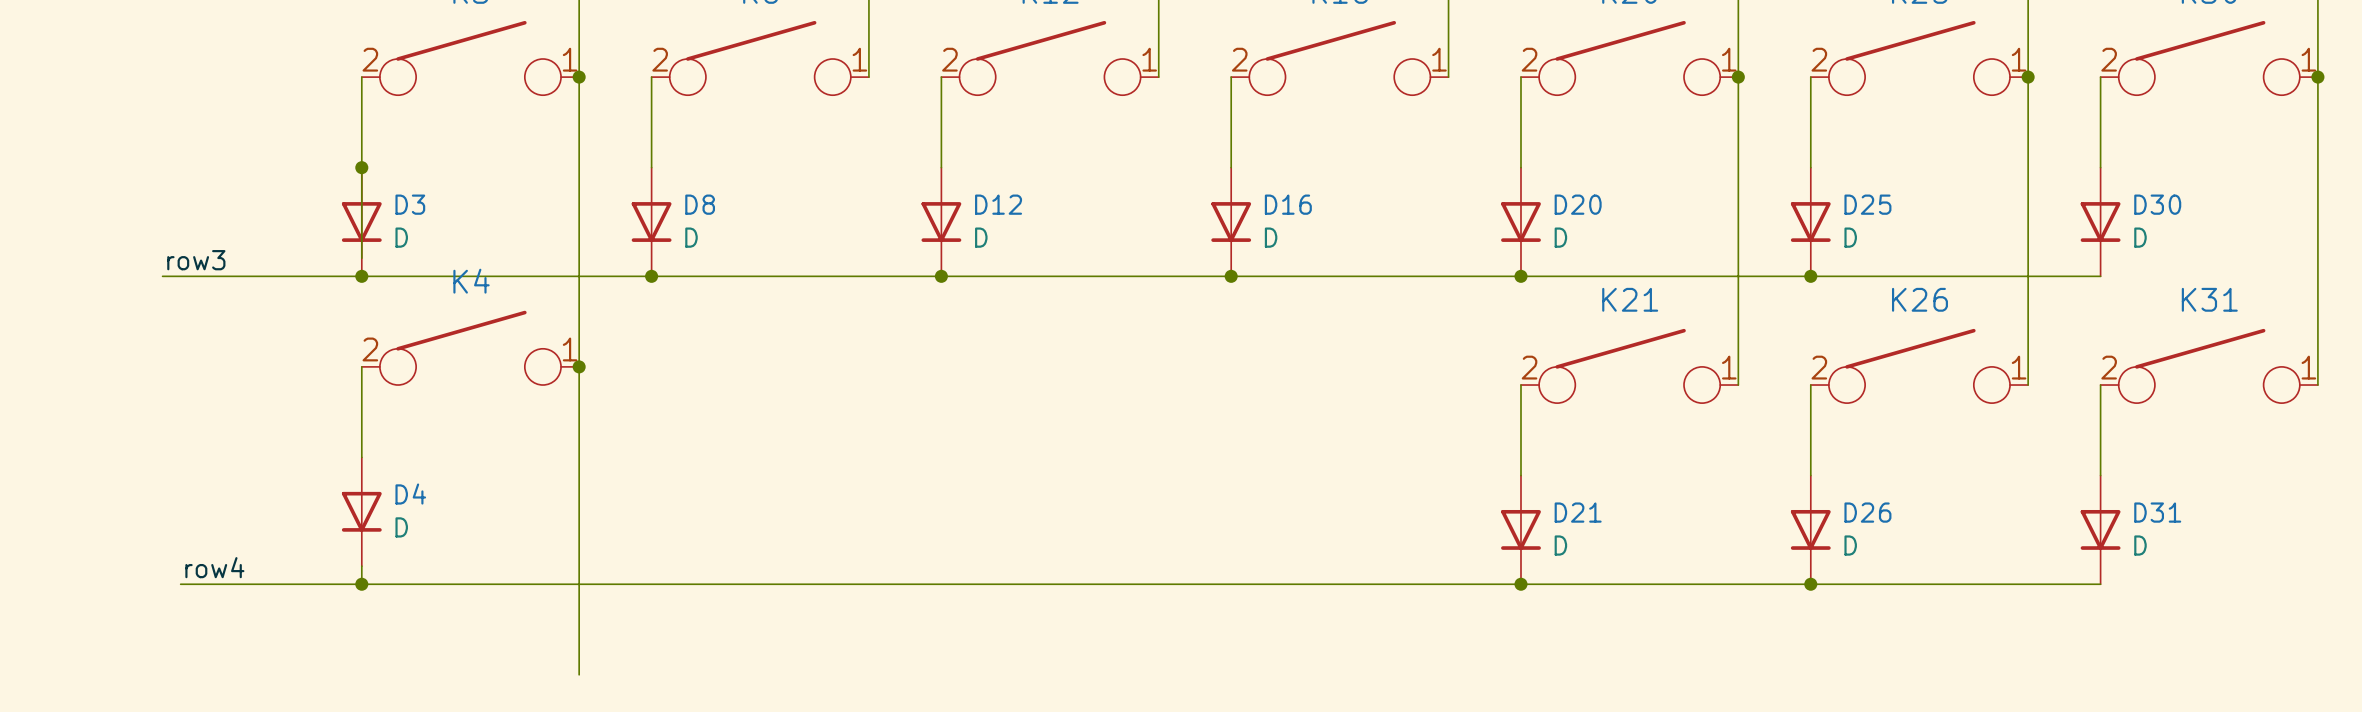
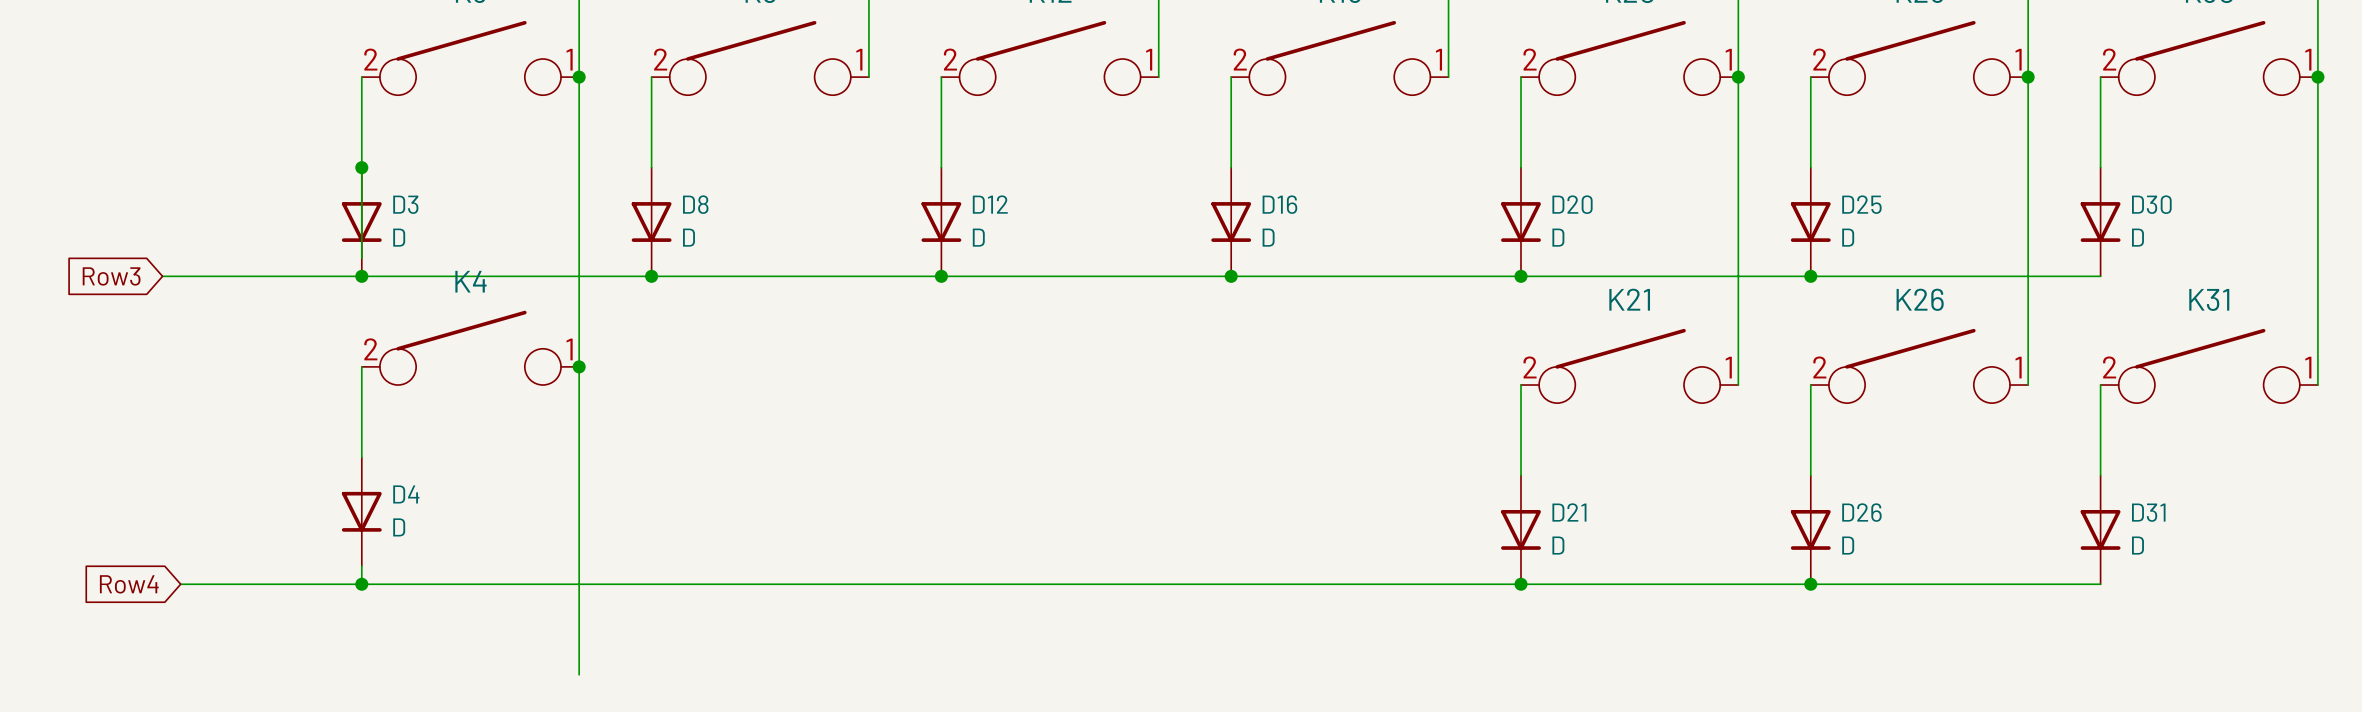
label: row3 (196, 260) -> none
global label: none -> Row3 (111, 276)
label: row4 (214, 567) -> none
global label: none -> Row4 (129, 584)

